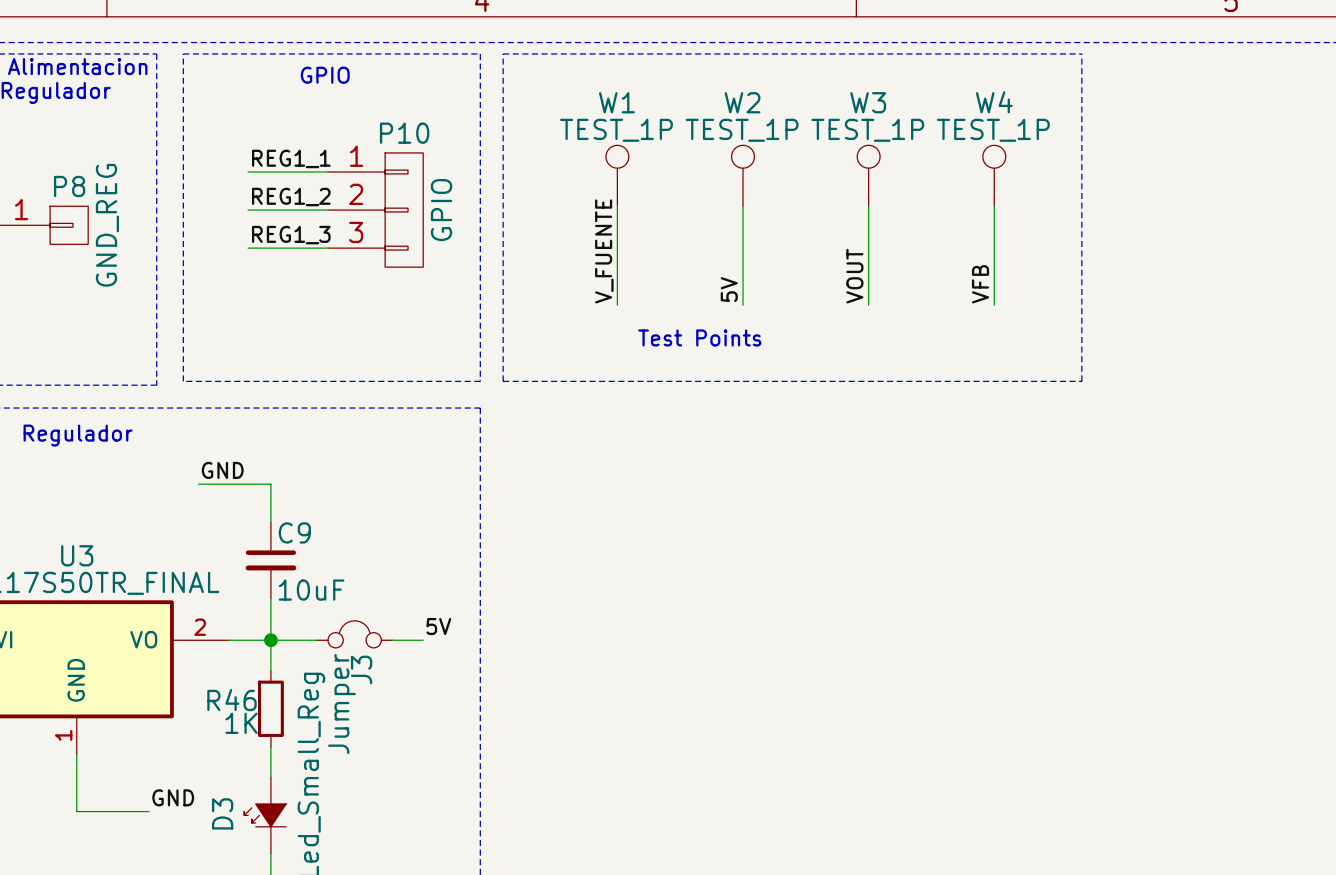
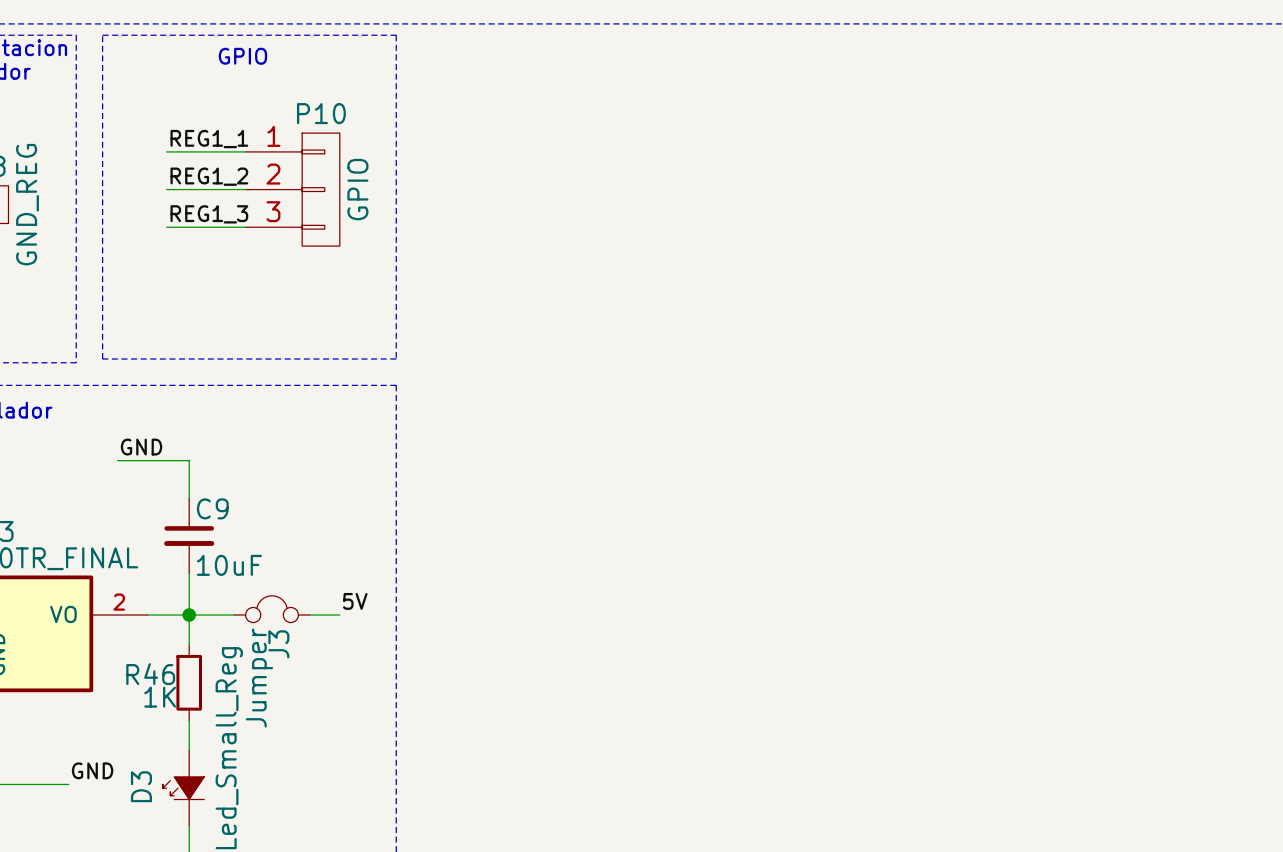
line: (503, 53) (503, 381) (1081, 381) (1081, 53) (503, 53) -> none
W1: TEST_1P (617, 175) -> none
W2: TEST_1P (743, 175) -> none
W3: TEST_1P (868, 175) -> none
W4: TEST_1P (994, 175) -> none
wire: (617, 206) (617, 305) -> none
wire: (743, 206) (743, 305) -> none
wire: (868, 206) (868, 305) -> none
wire: (994, 206) (994, 305) -> none
label: V_FUENTE (604, 251) -> none
label: VOUT (854, 276) -> none
label: VFB (980, 284) -> none
label: 5V (729, 289) -> none
text: Test Points (699, 337) -> none

